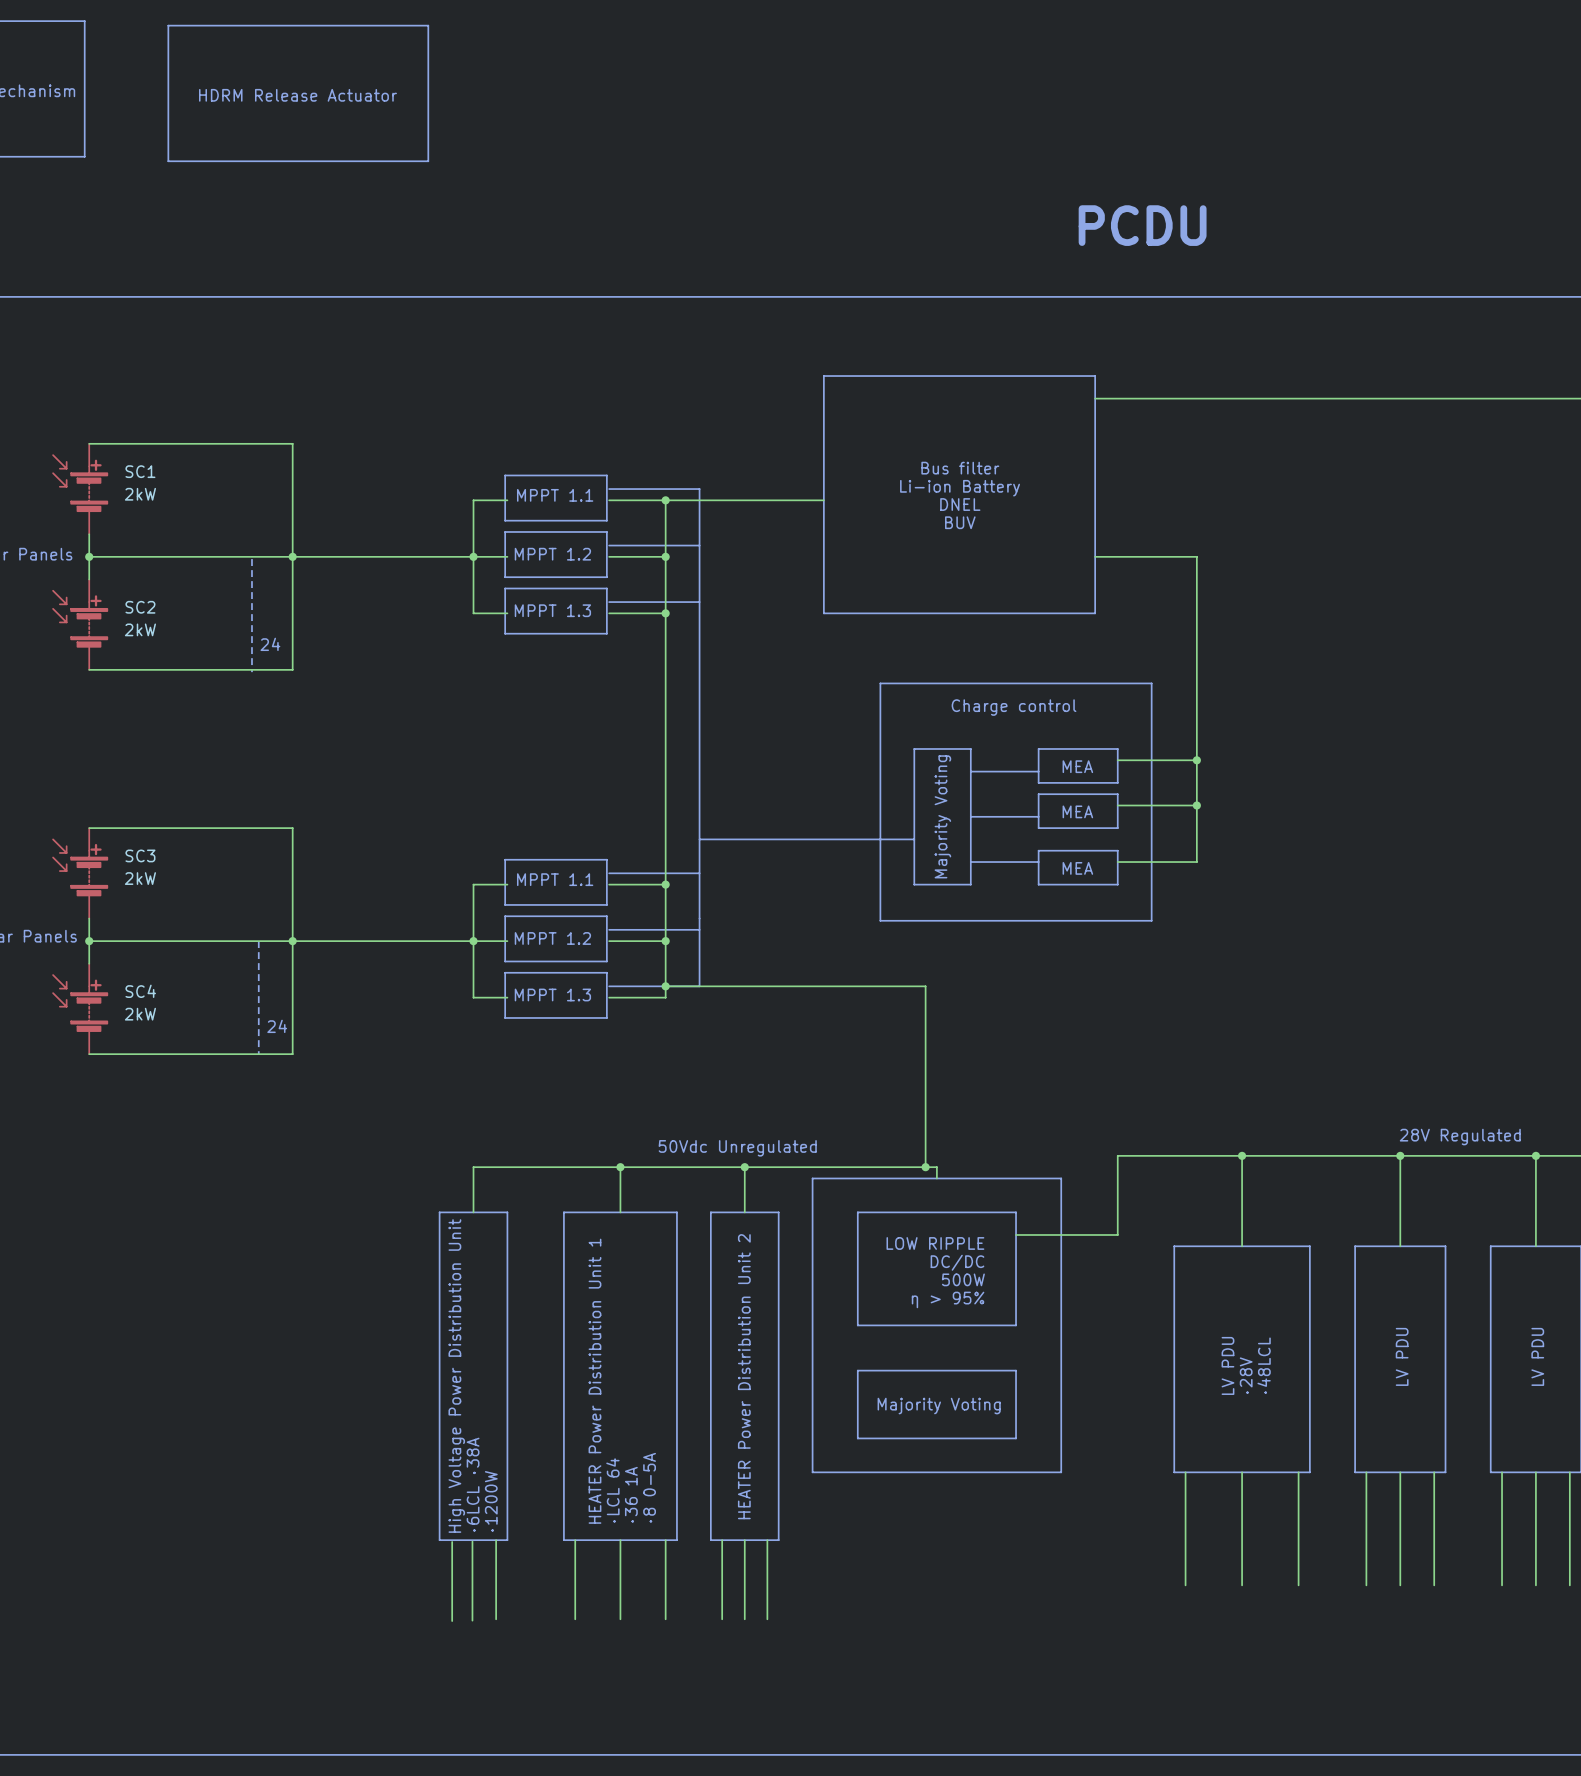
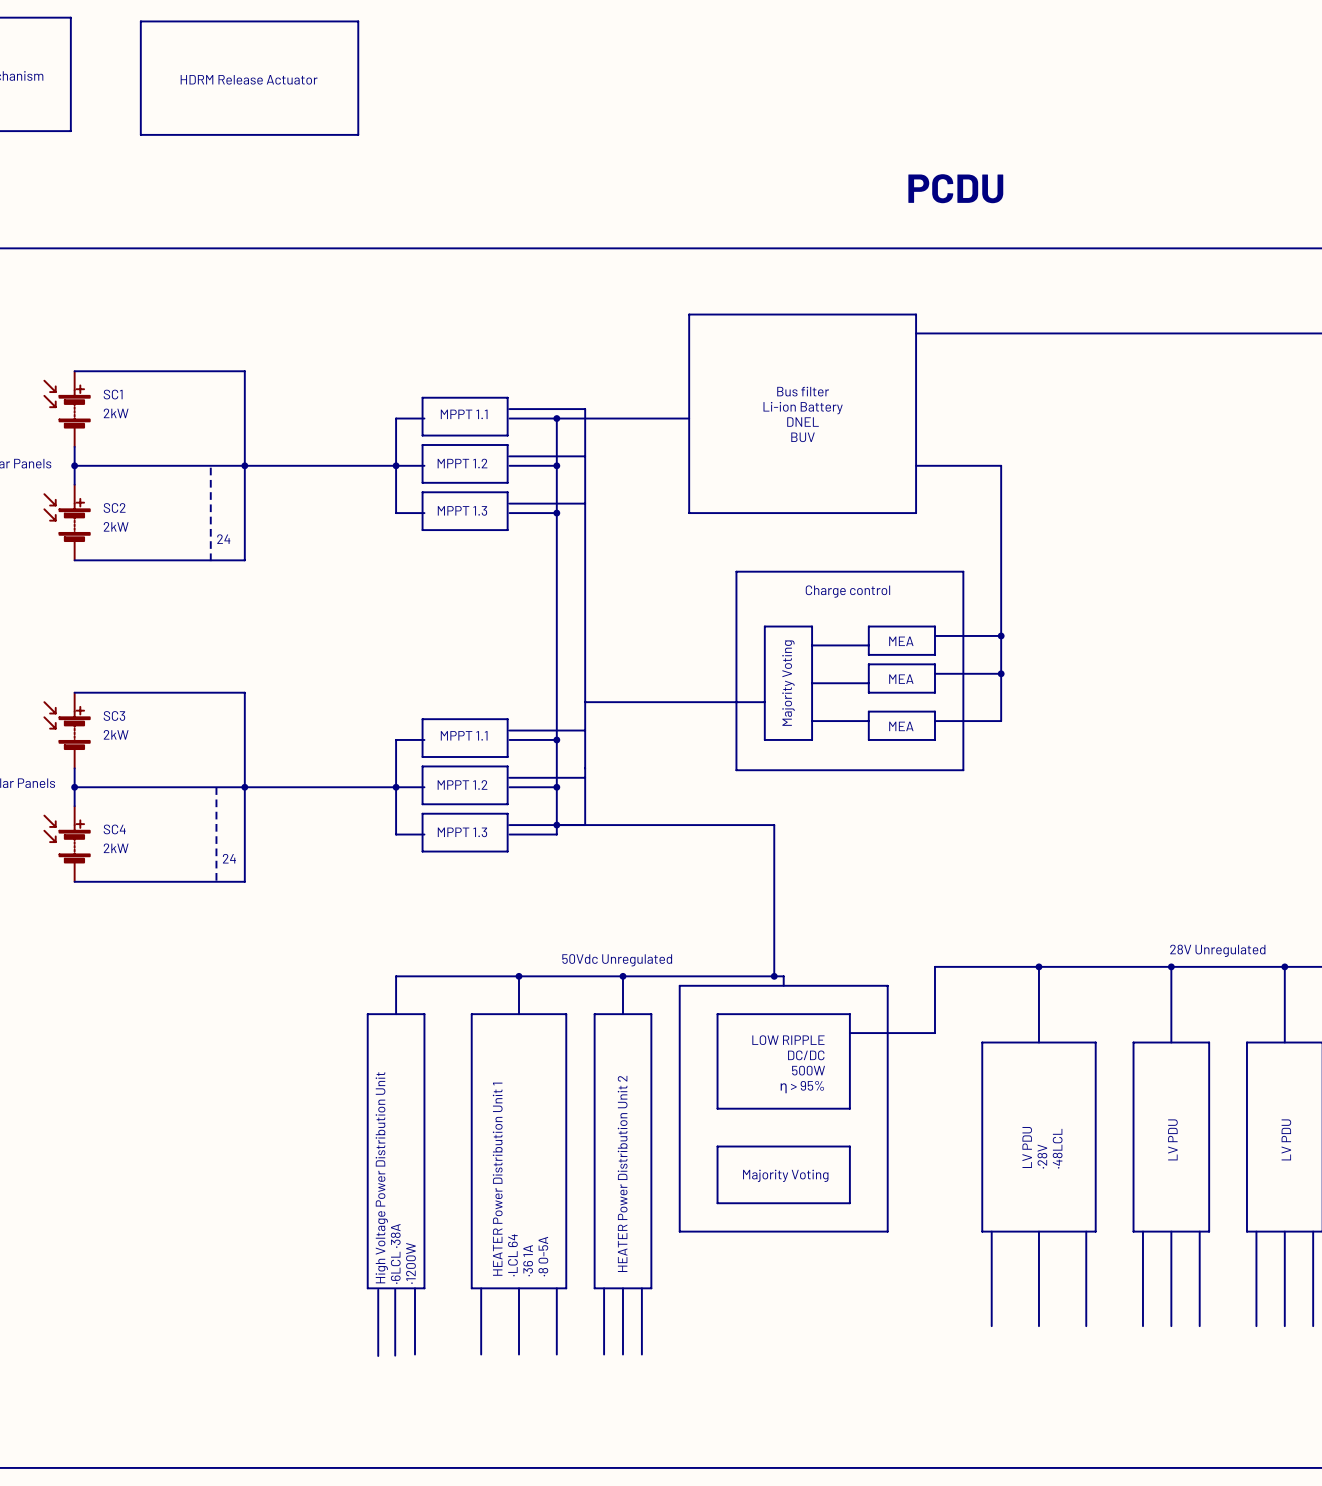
text: 28V Regulated (1460, 1137) -> 28V Unregulated (1217, 950)

